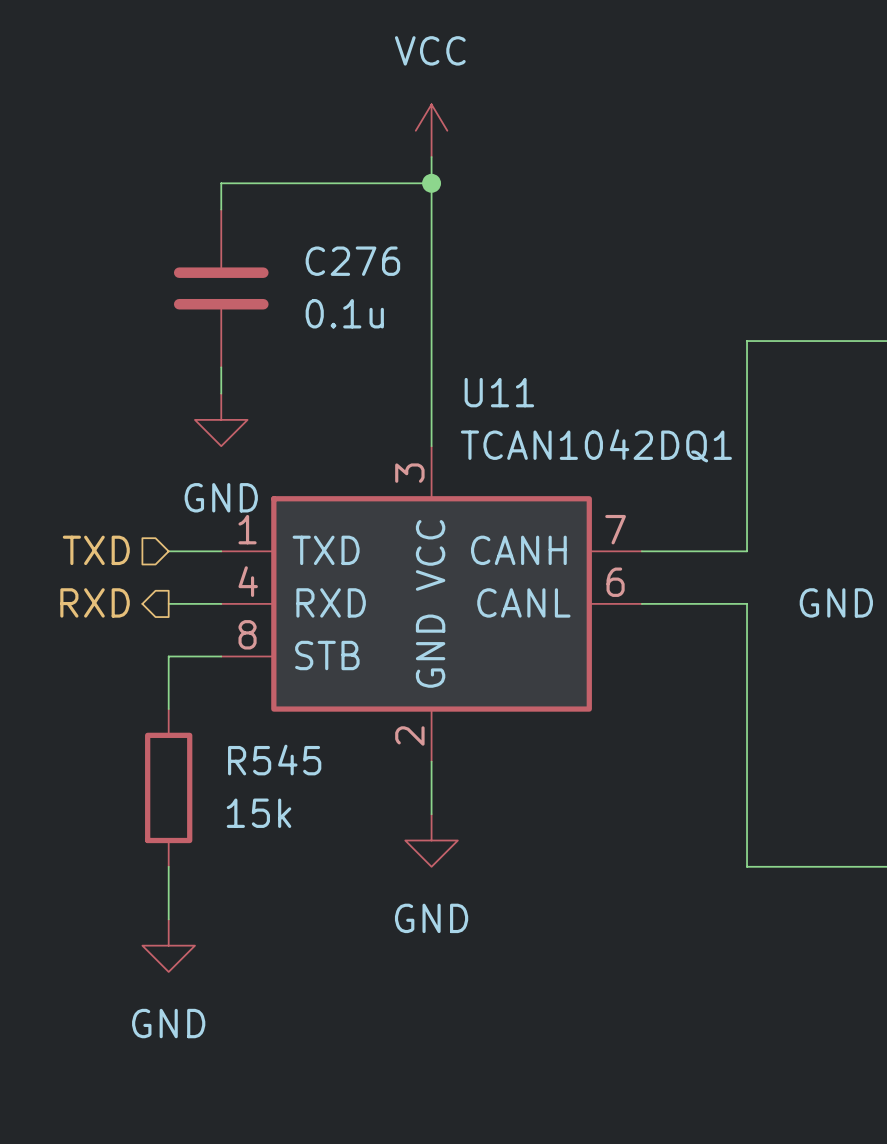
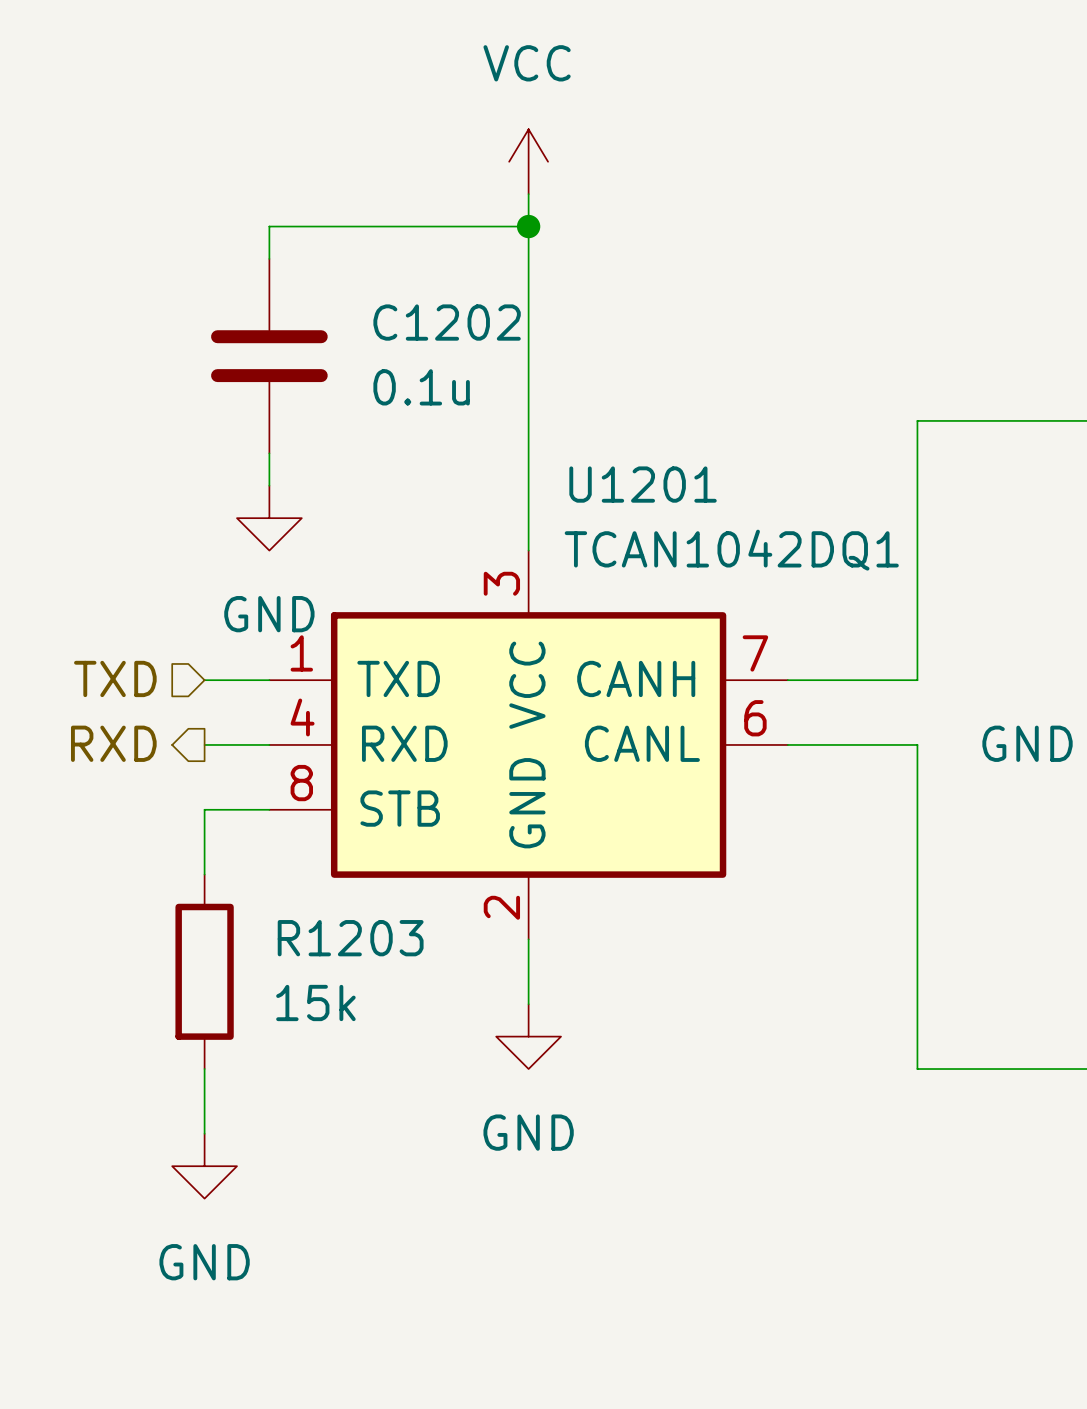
C276 name: C276 (352, 261) -> C1202 (447, 322)
U11 name: U11 (499, 392) -> U1201 (643, 484)
R545 name: R545 (274, 760) -> R1203 (350, 938)

